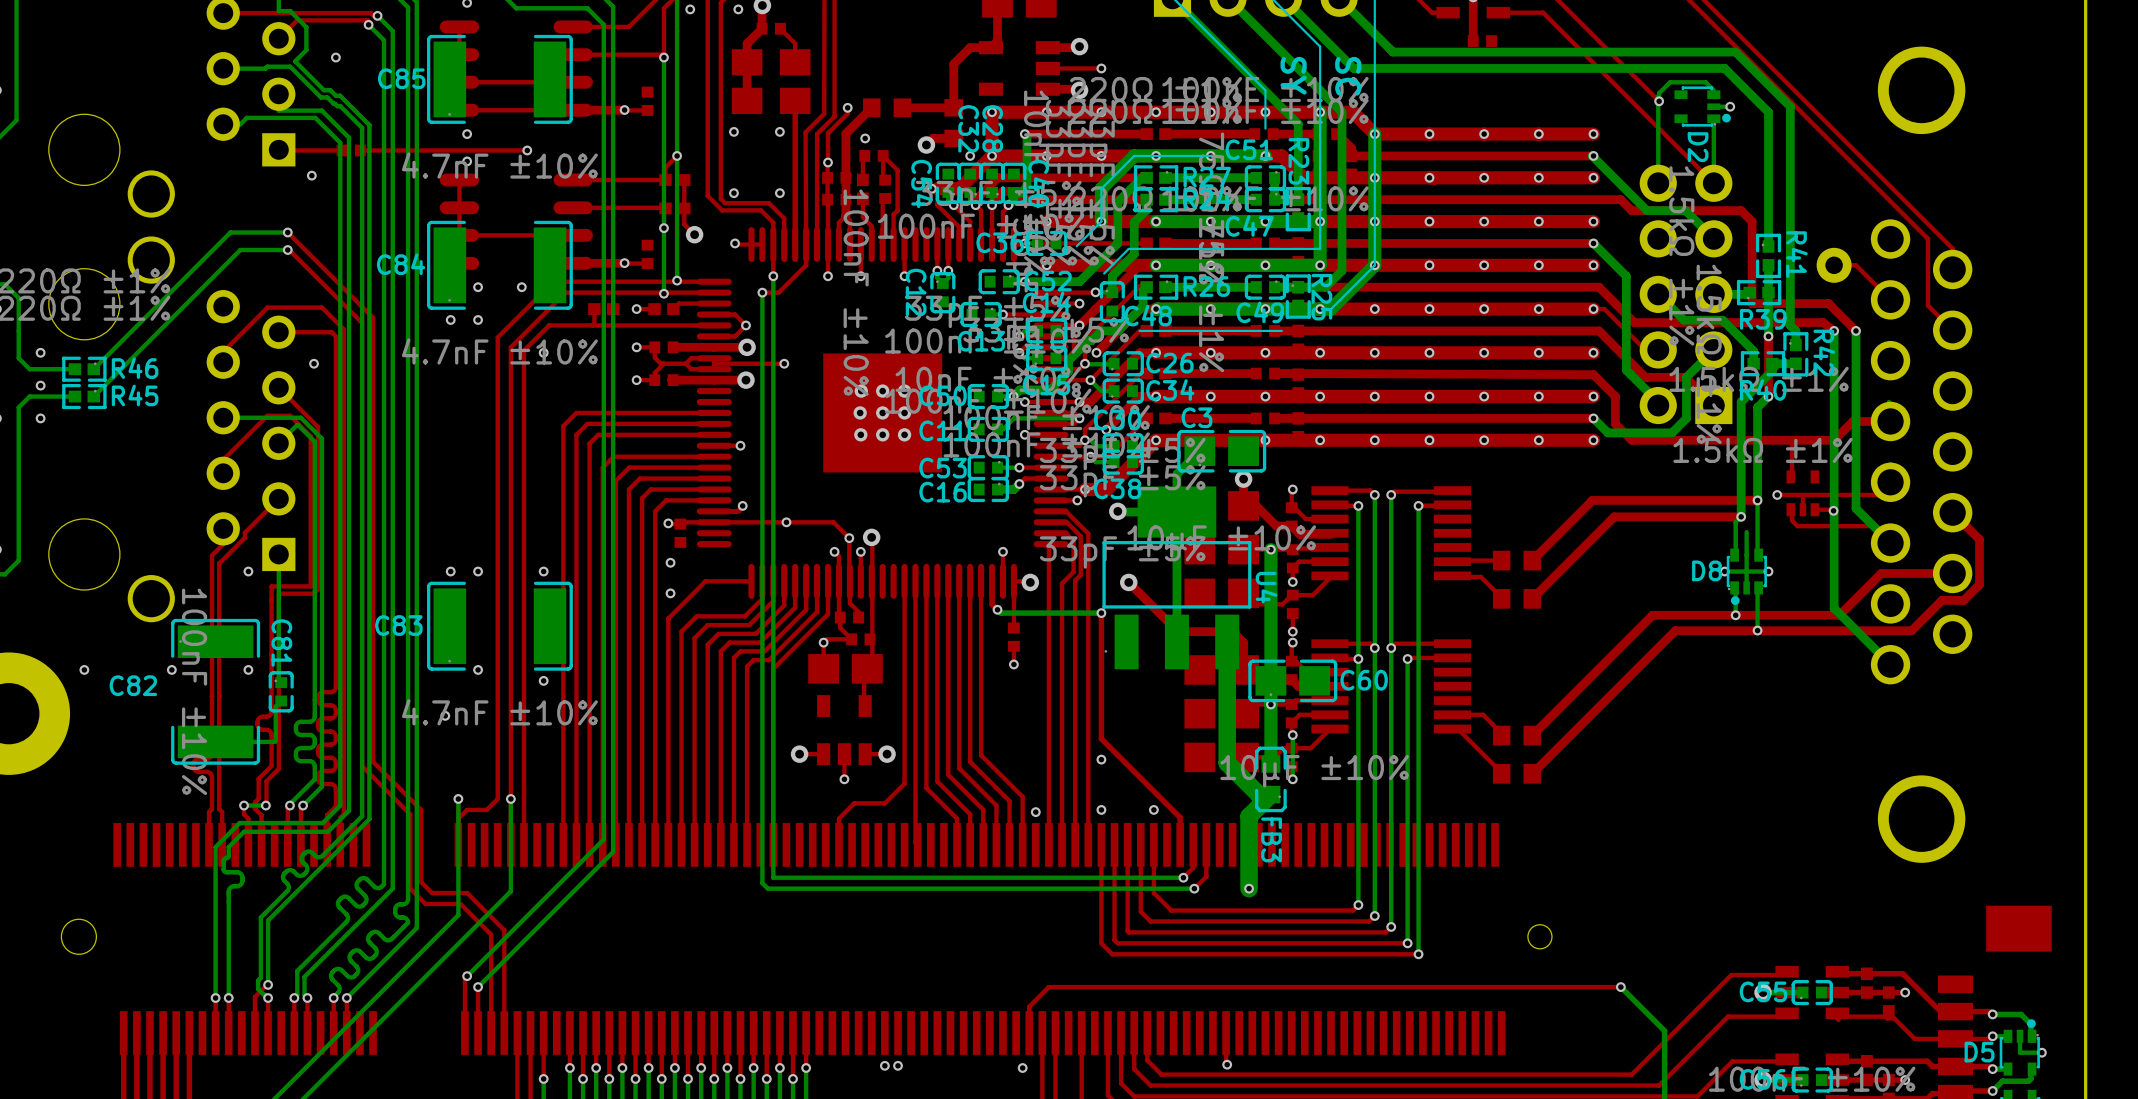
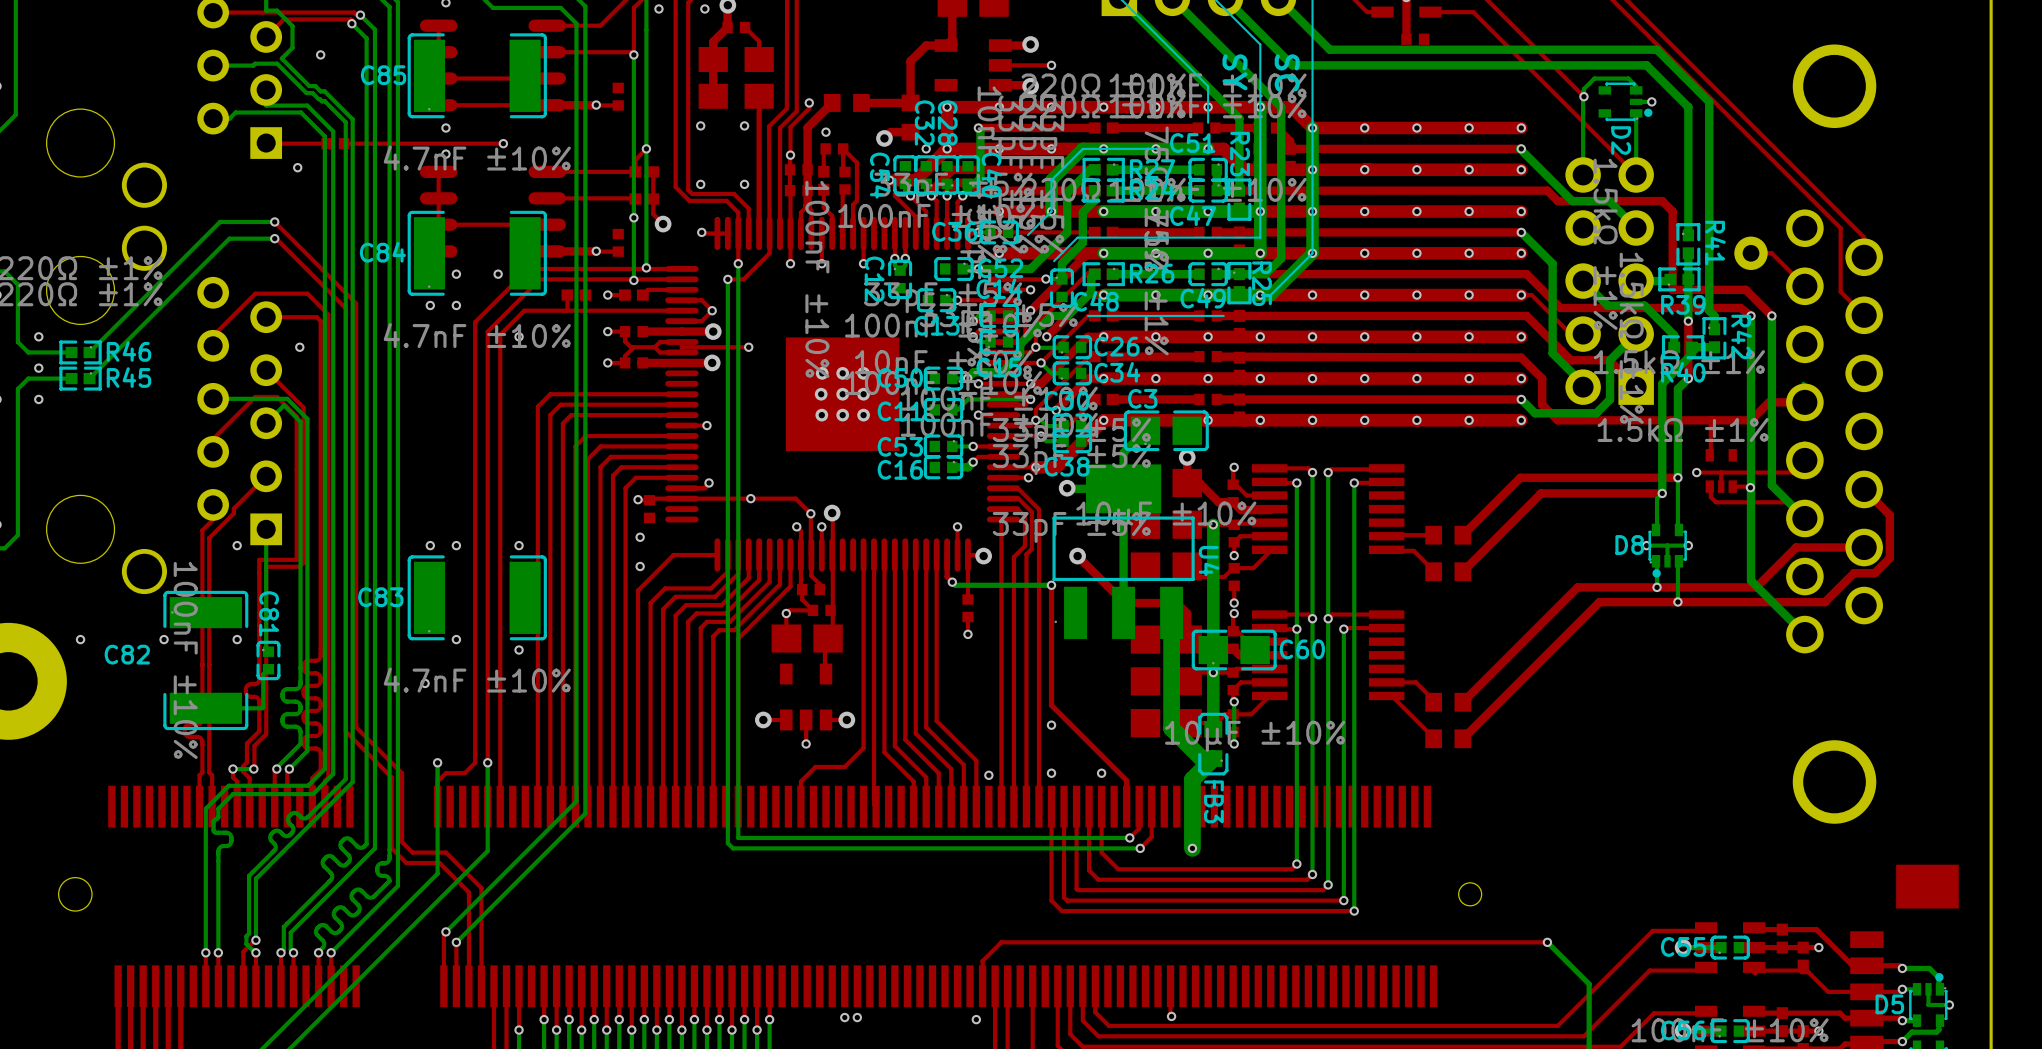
bottom track: (1746, 532) (1746, 571) -> none

